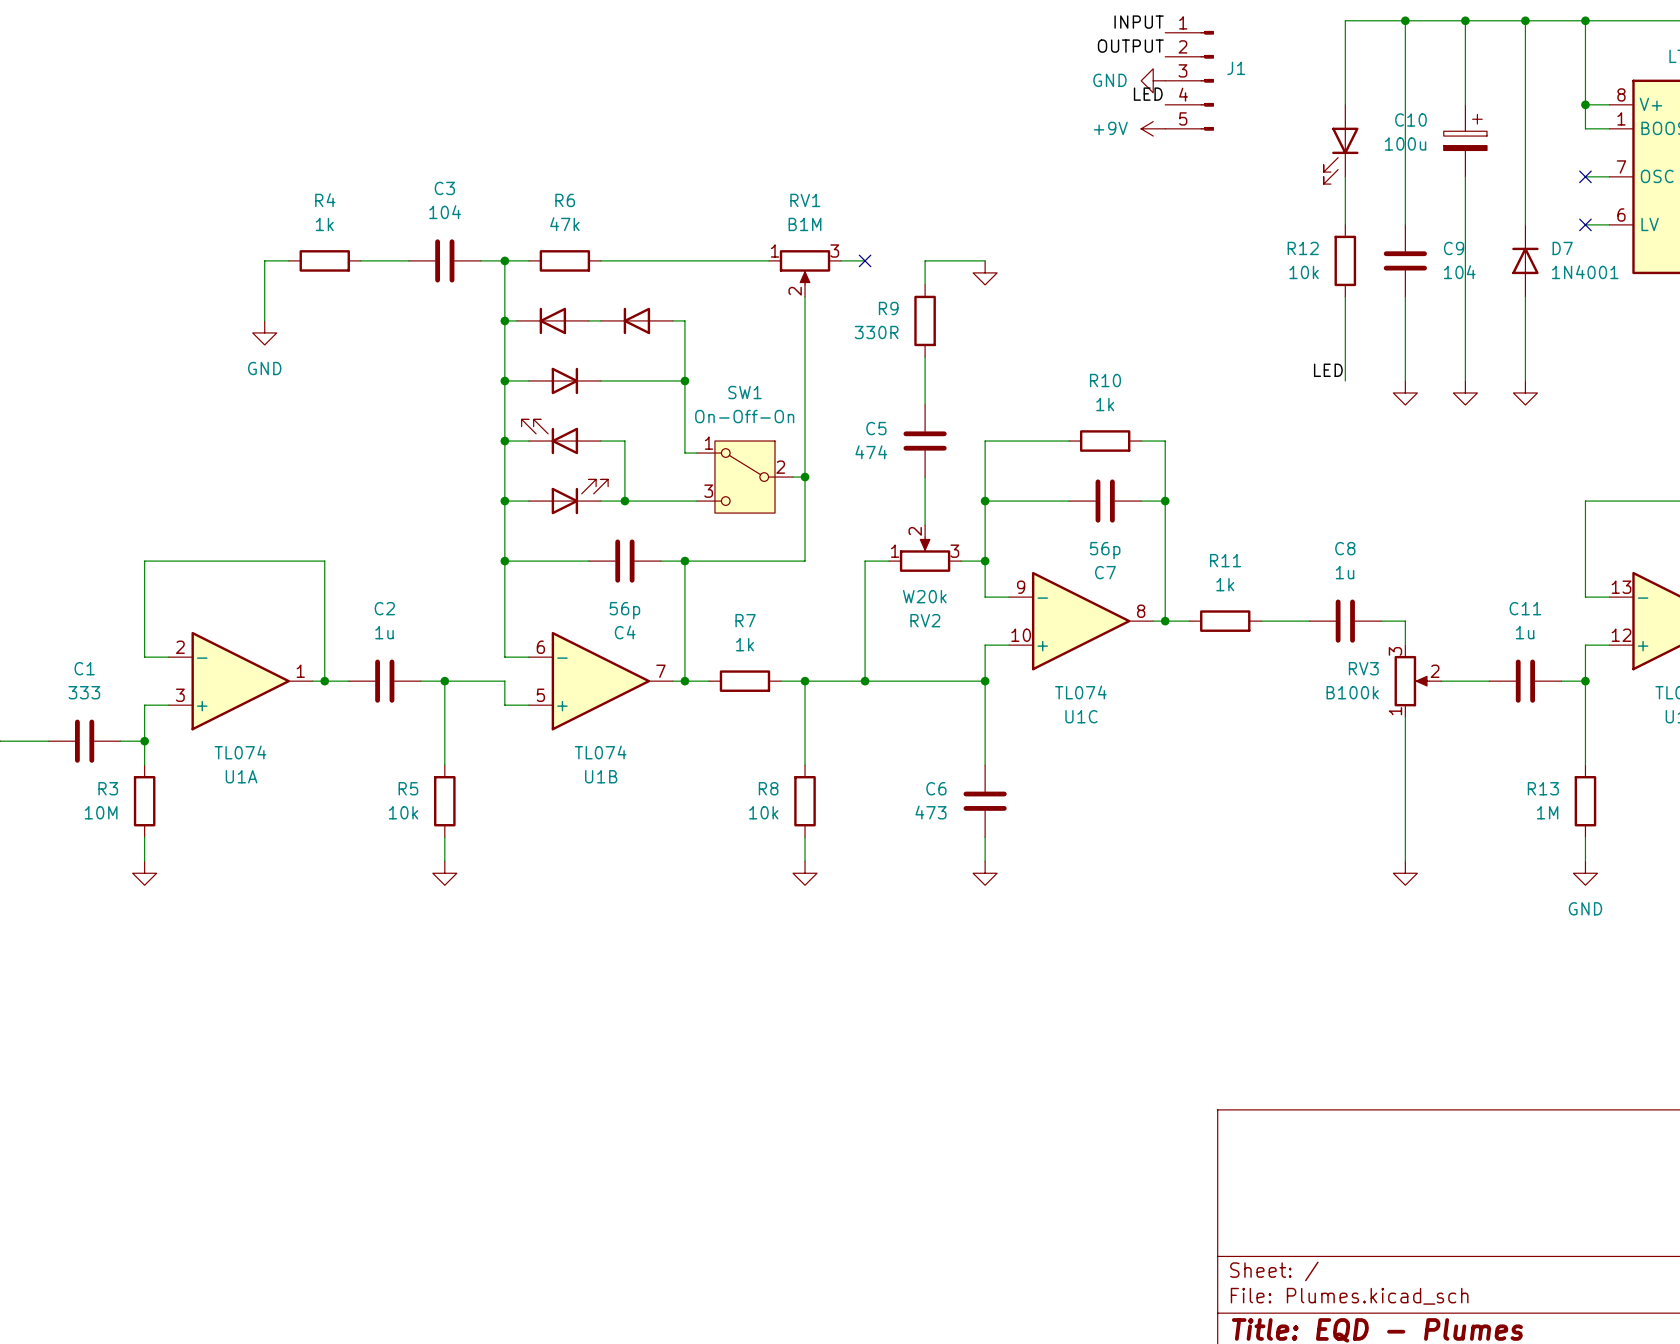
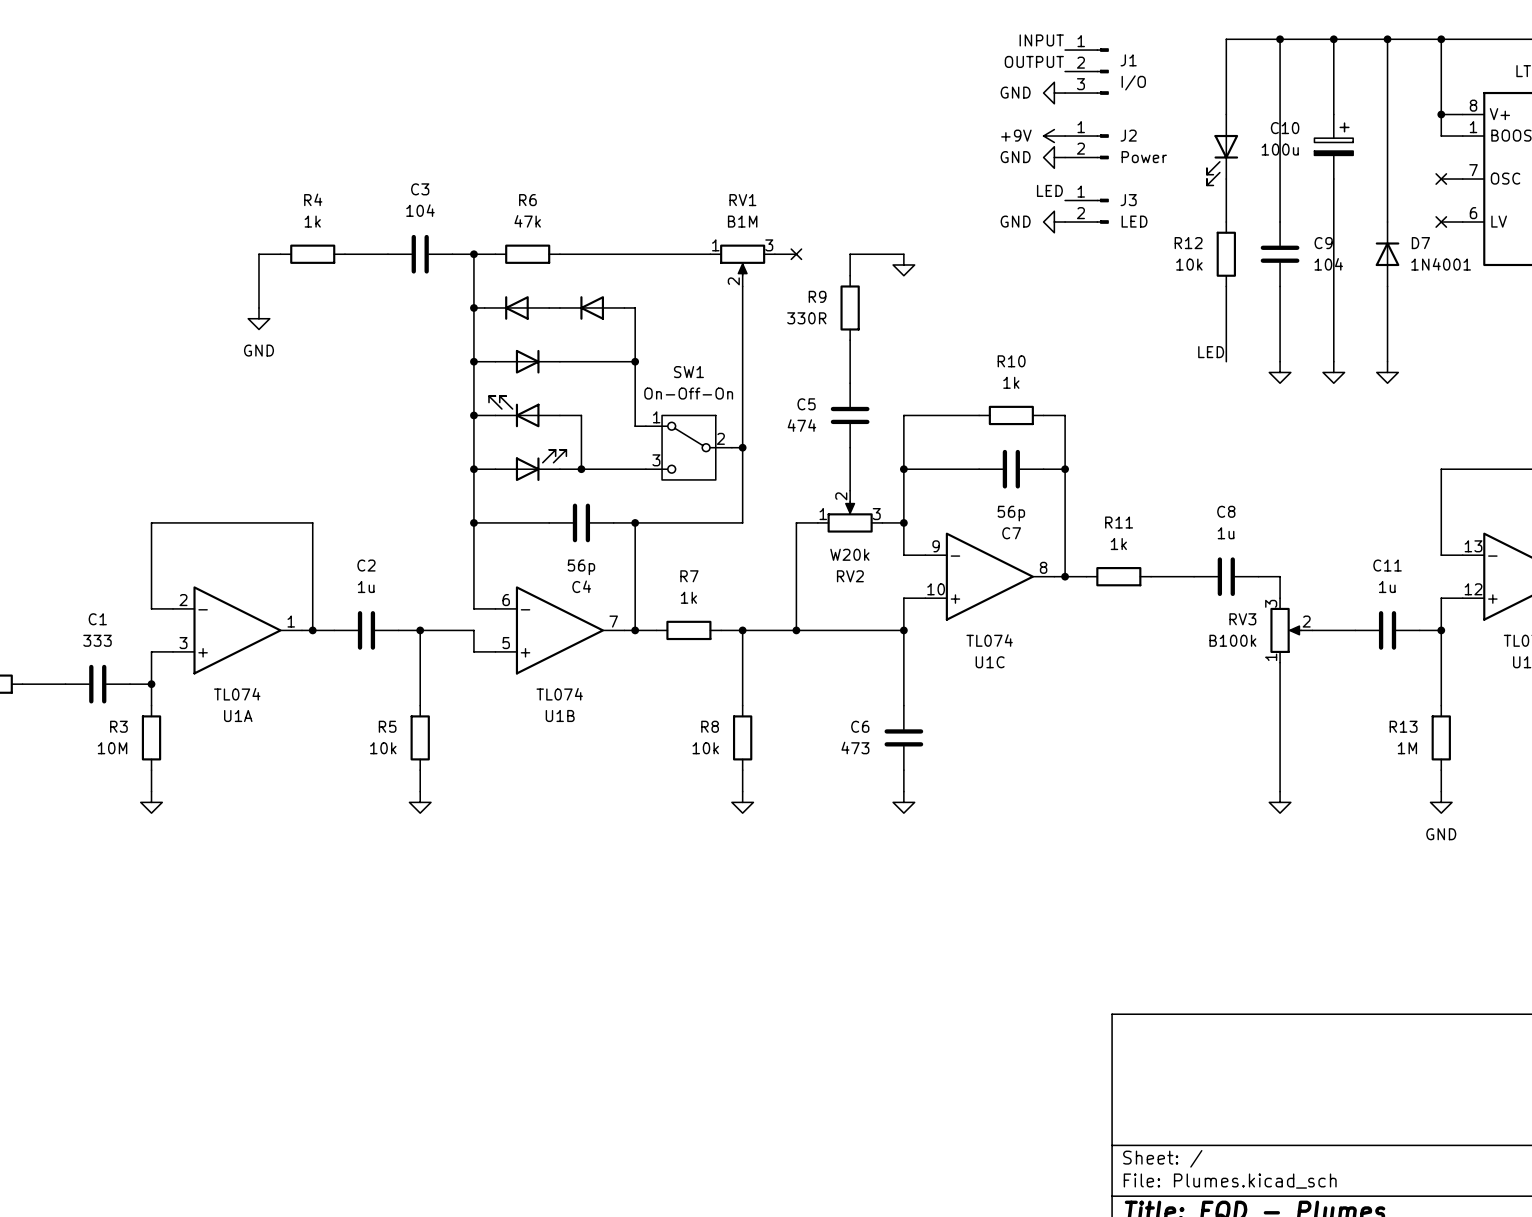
J1 symbol: [1165, 30, 1214, 131] -> [1065, 48, 1109, 95]
J1 value: none -> I/O (1133, 82)
label position: LED (1148, 94) -> LED (1049, 190)
J2: none -> Power (1086, 146)
power symbol: none -> GND (1054, 157)
J3: none -> LED (1086, 211)
power symbol: none -> GND (1054, 222)

